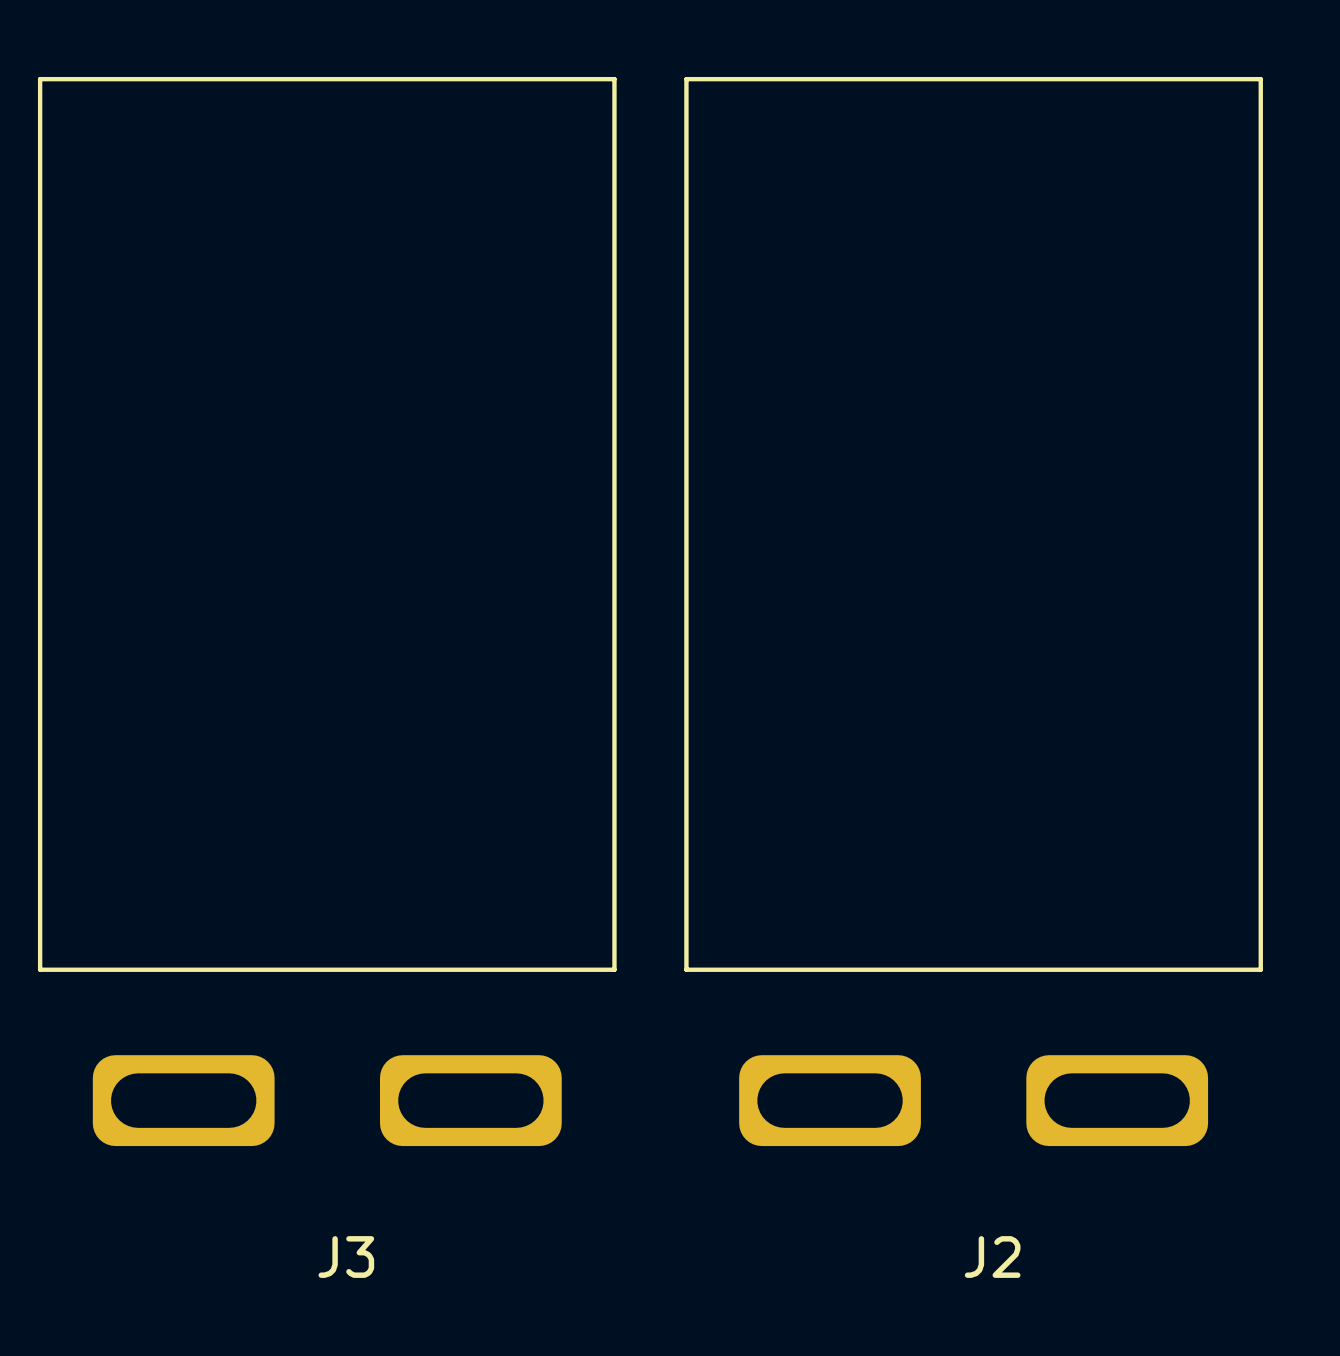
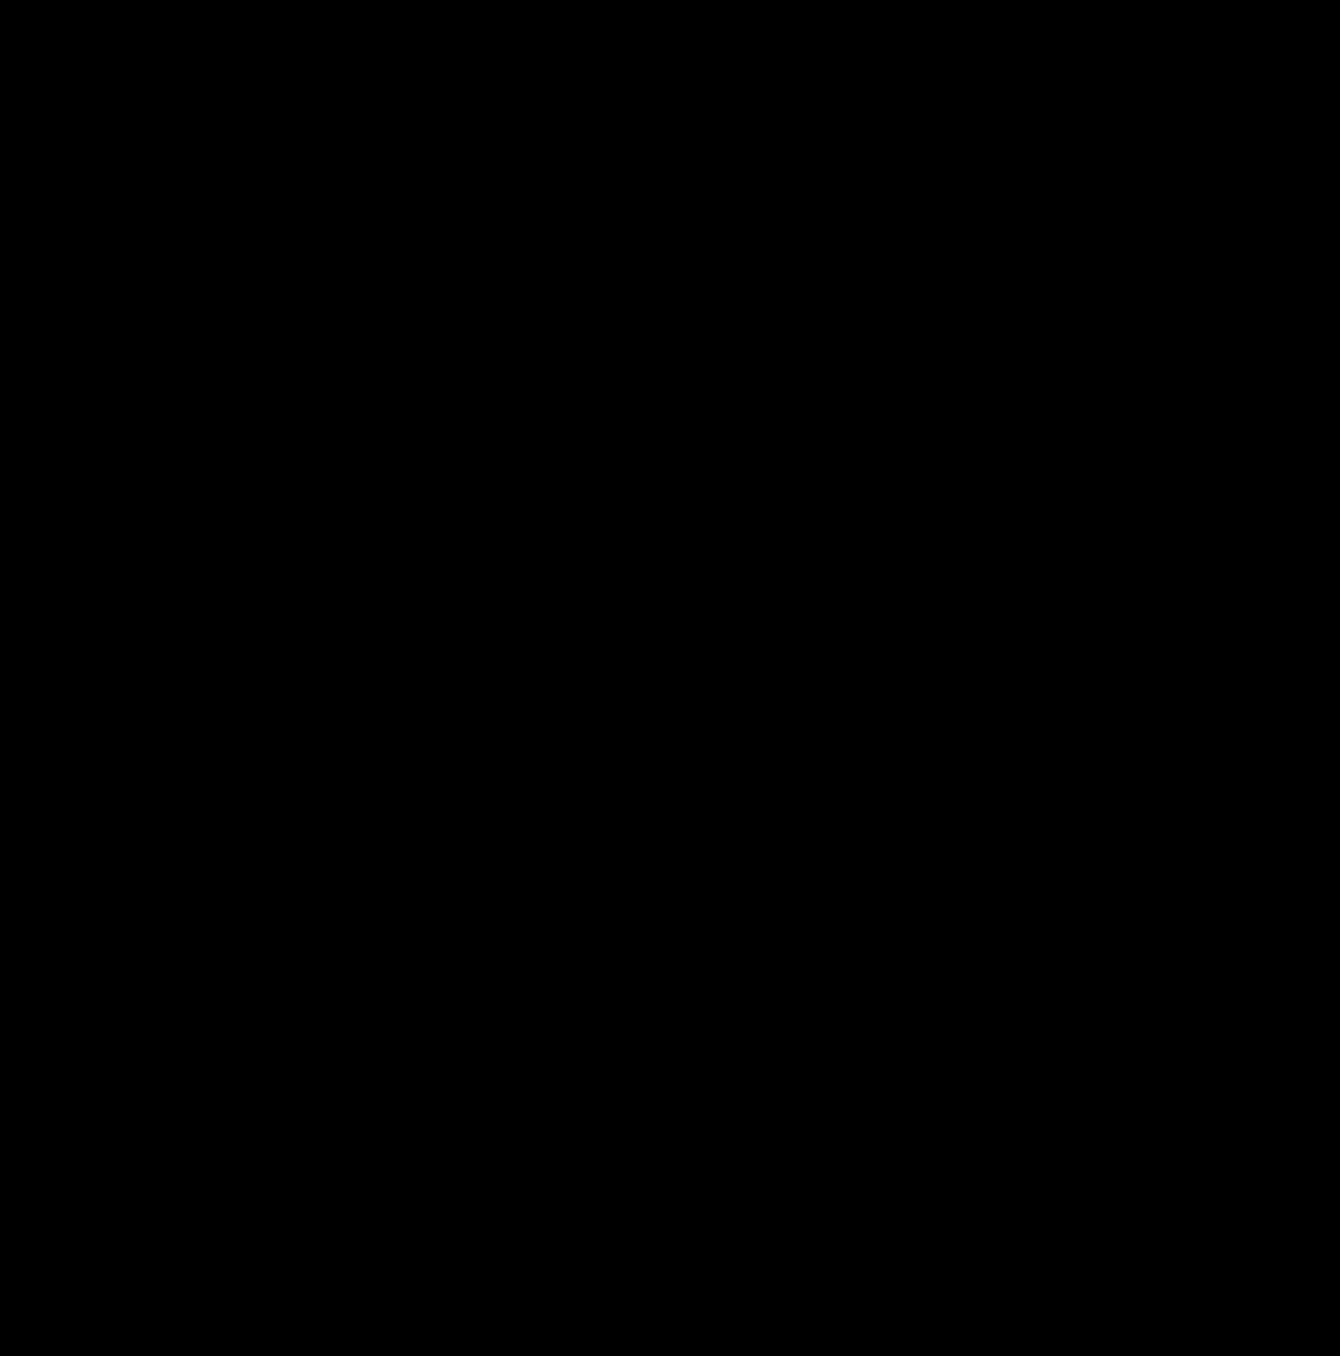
J3: (327, 611) -> none
J2: (973, 611) -> none

